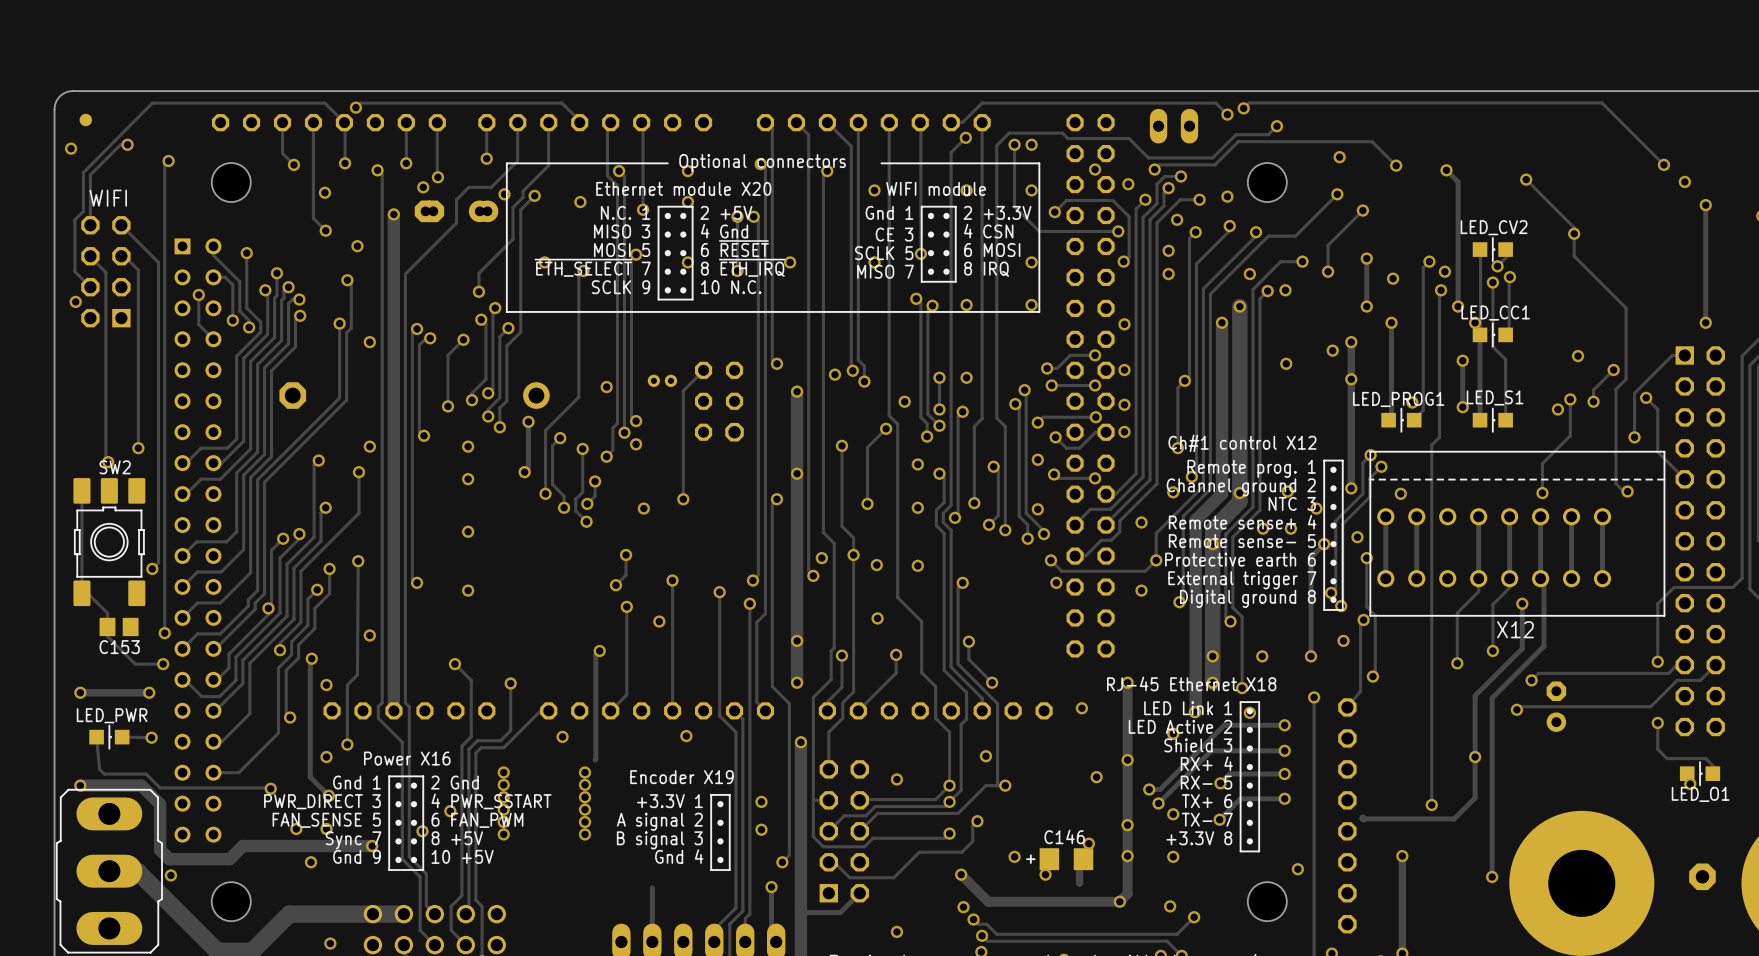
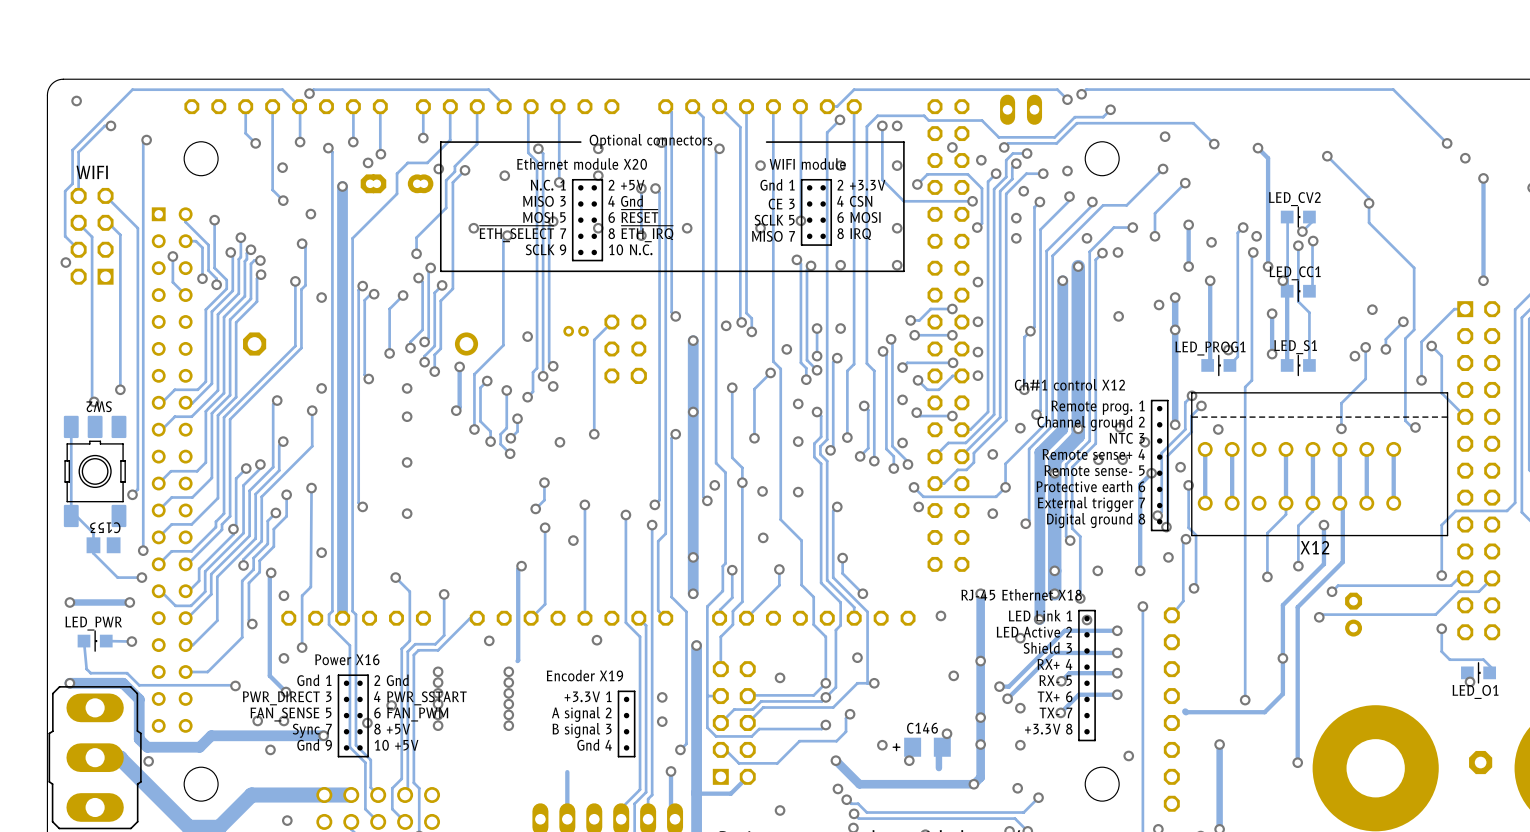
part: (85, 120) -> none
via position: (71, 148) -> (76, 101)
SW2 name rotation: 0° (115, 467) -> 180° (99, 406)
C153 name rotation: 0° (119, 647) -> 180° (105, 527)

